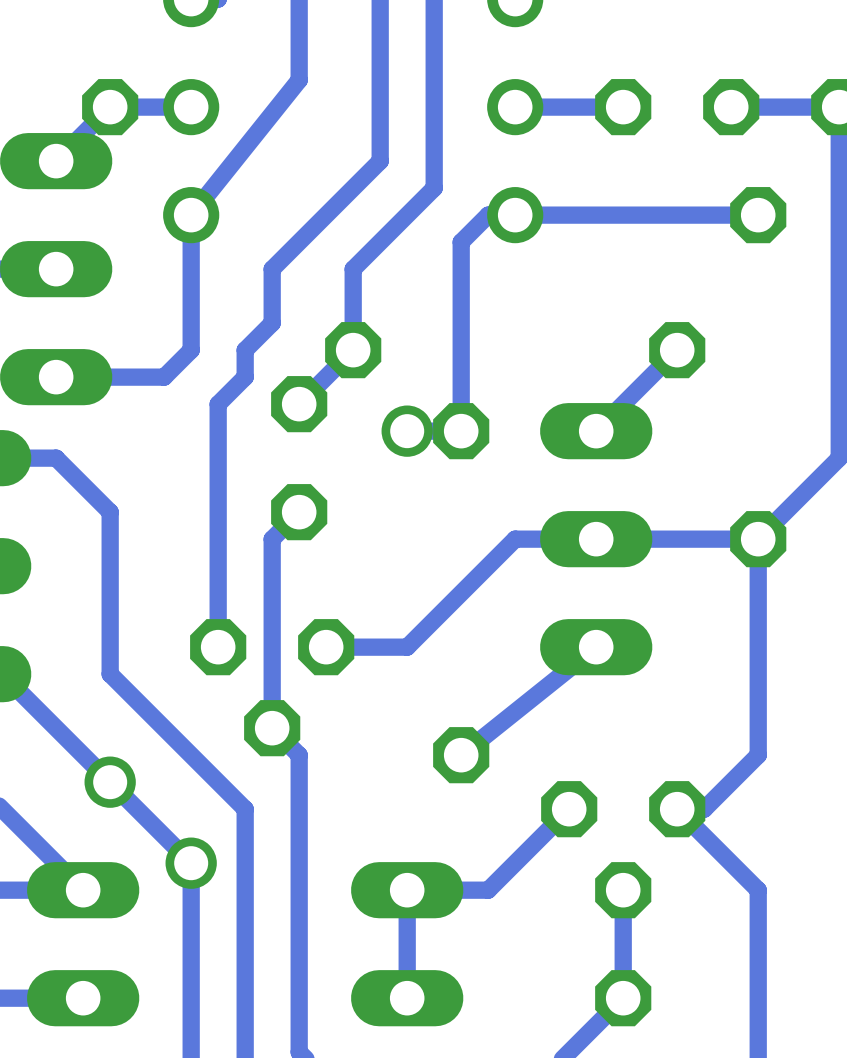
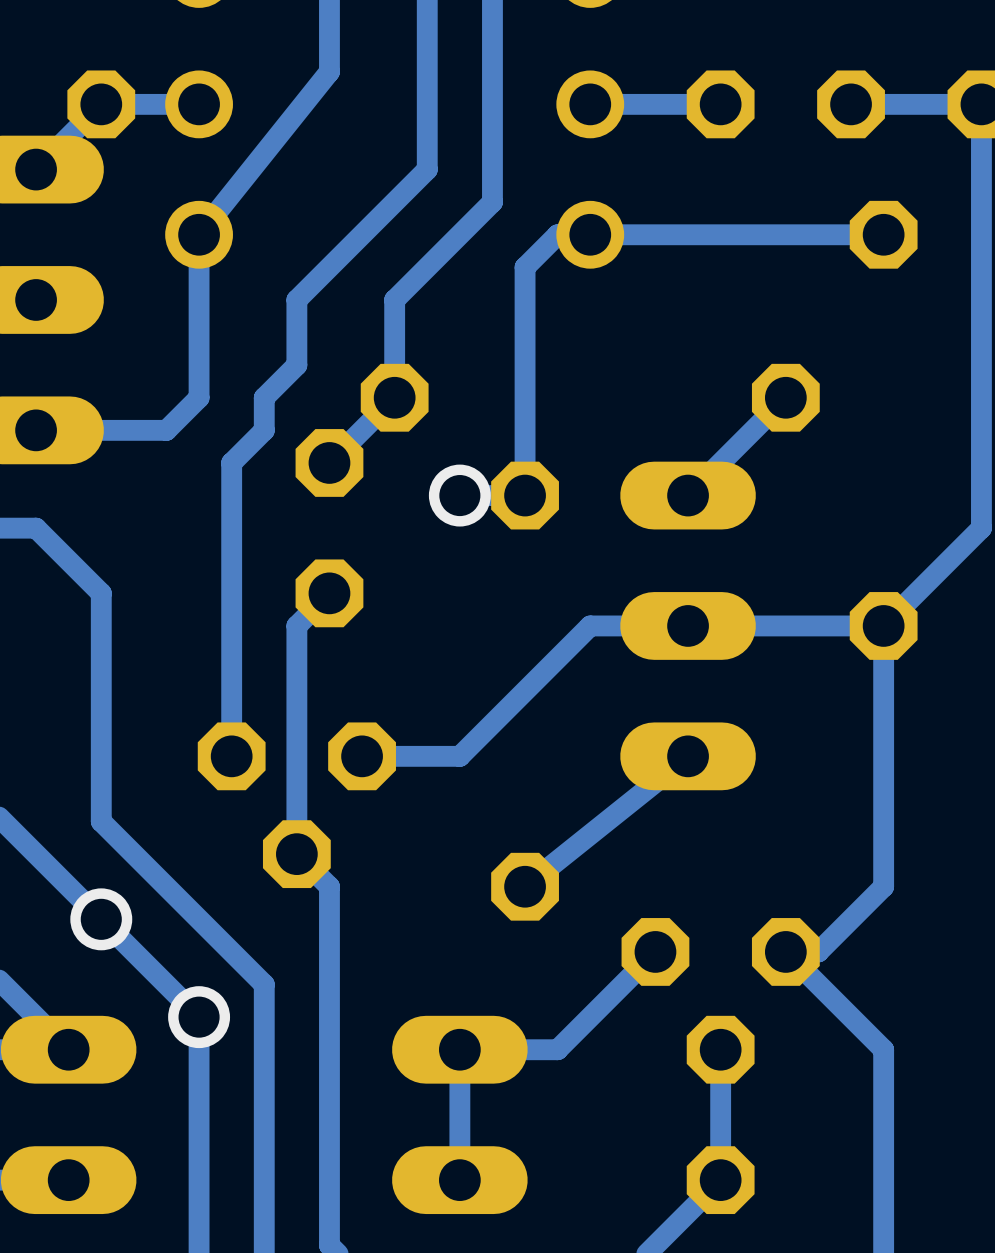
track: (110, 674) (245, 809) (245, 836) -> (101, 788) (101, 821) (264, 984)

